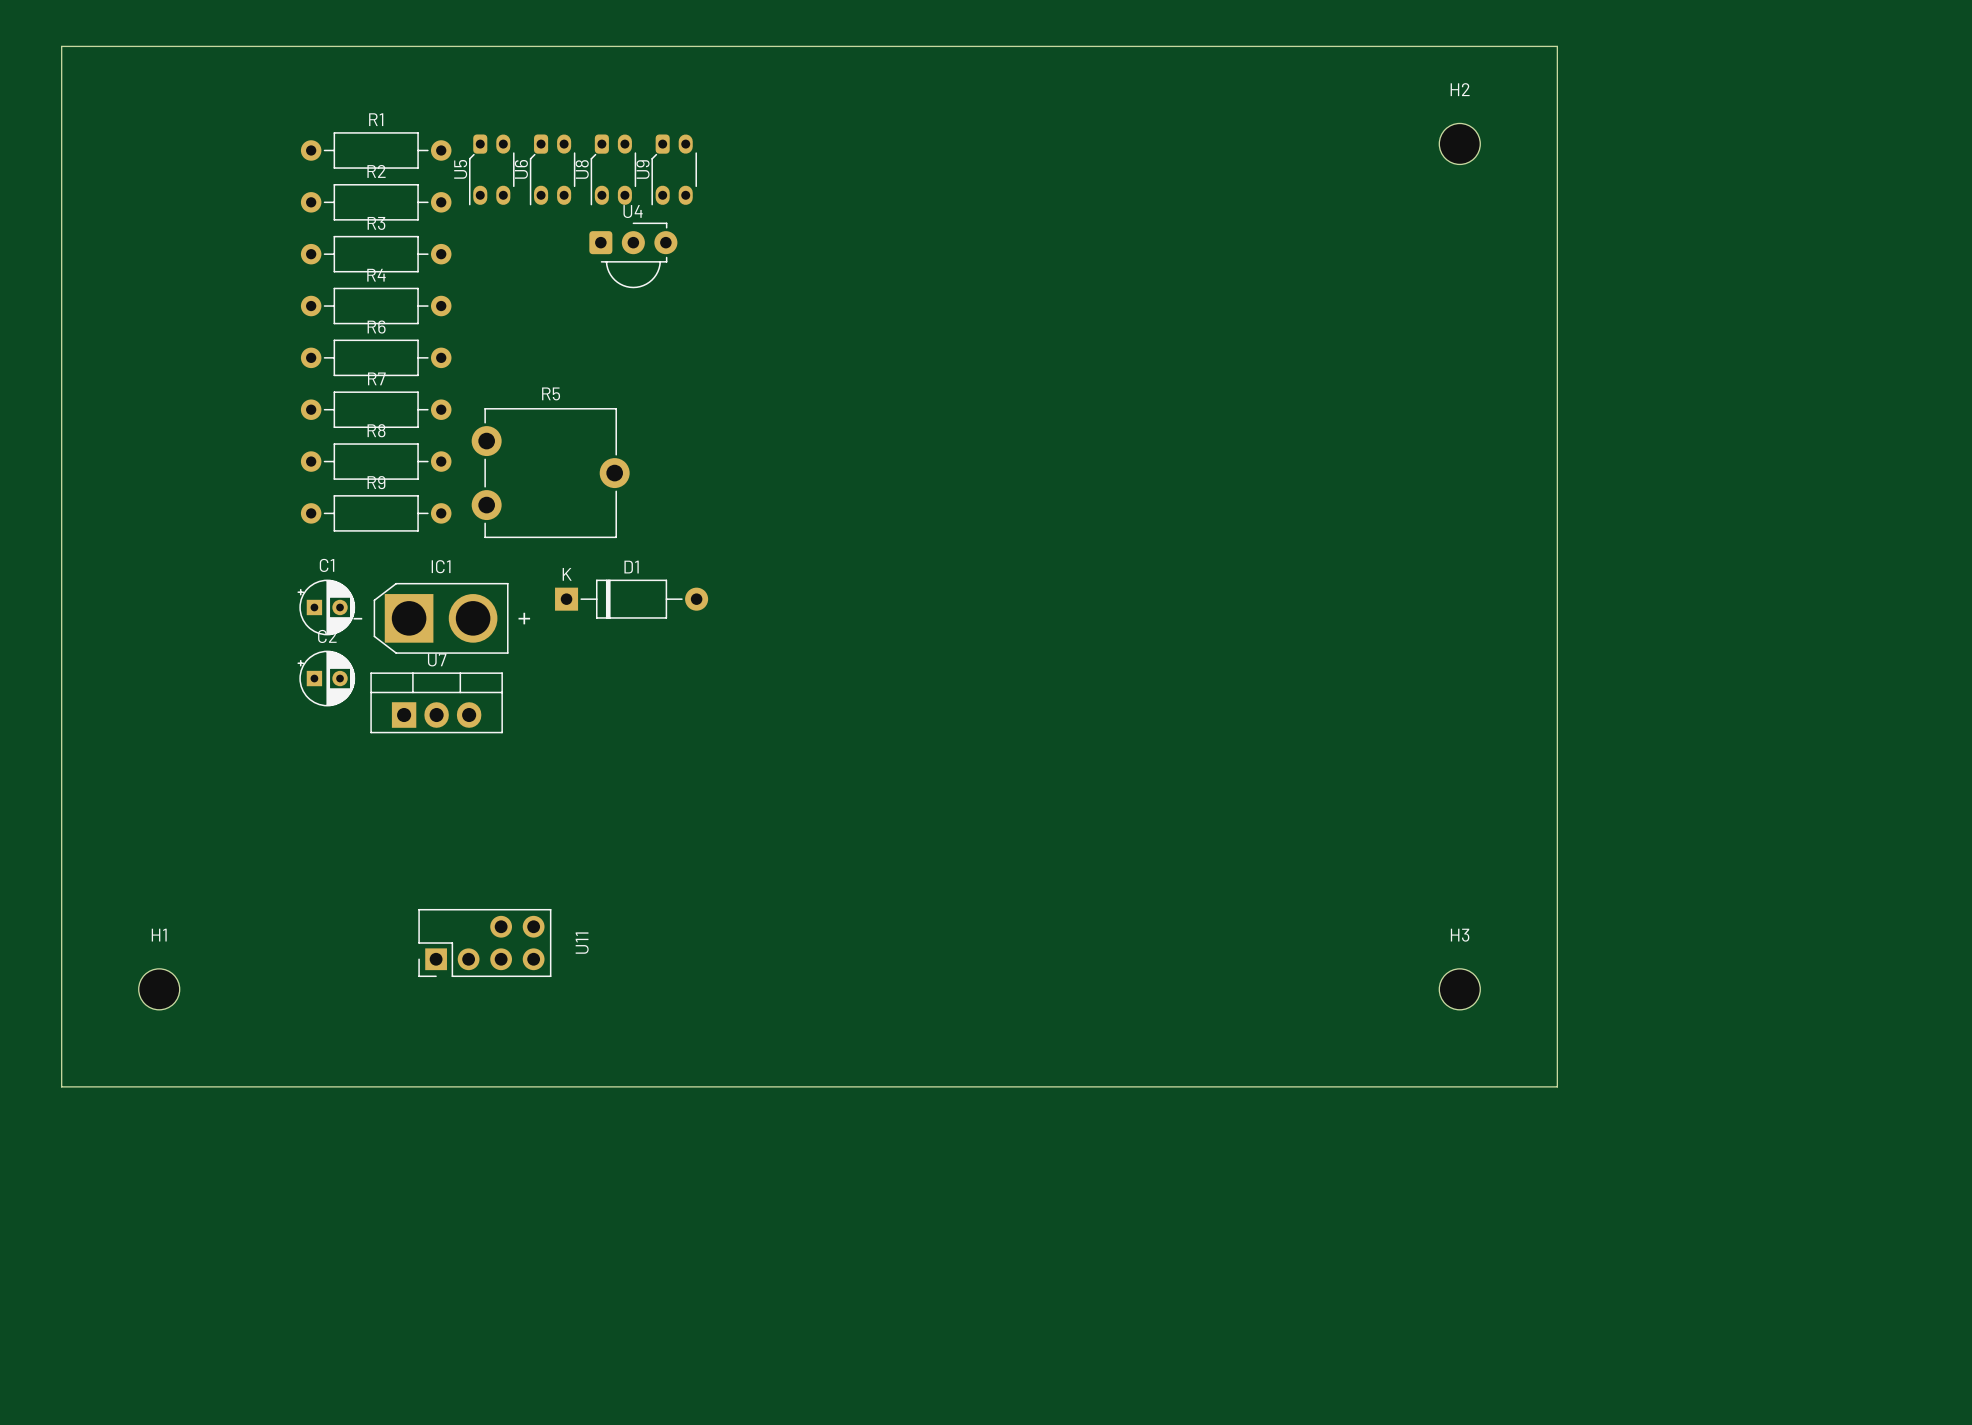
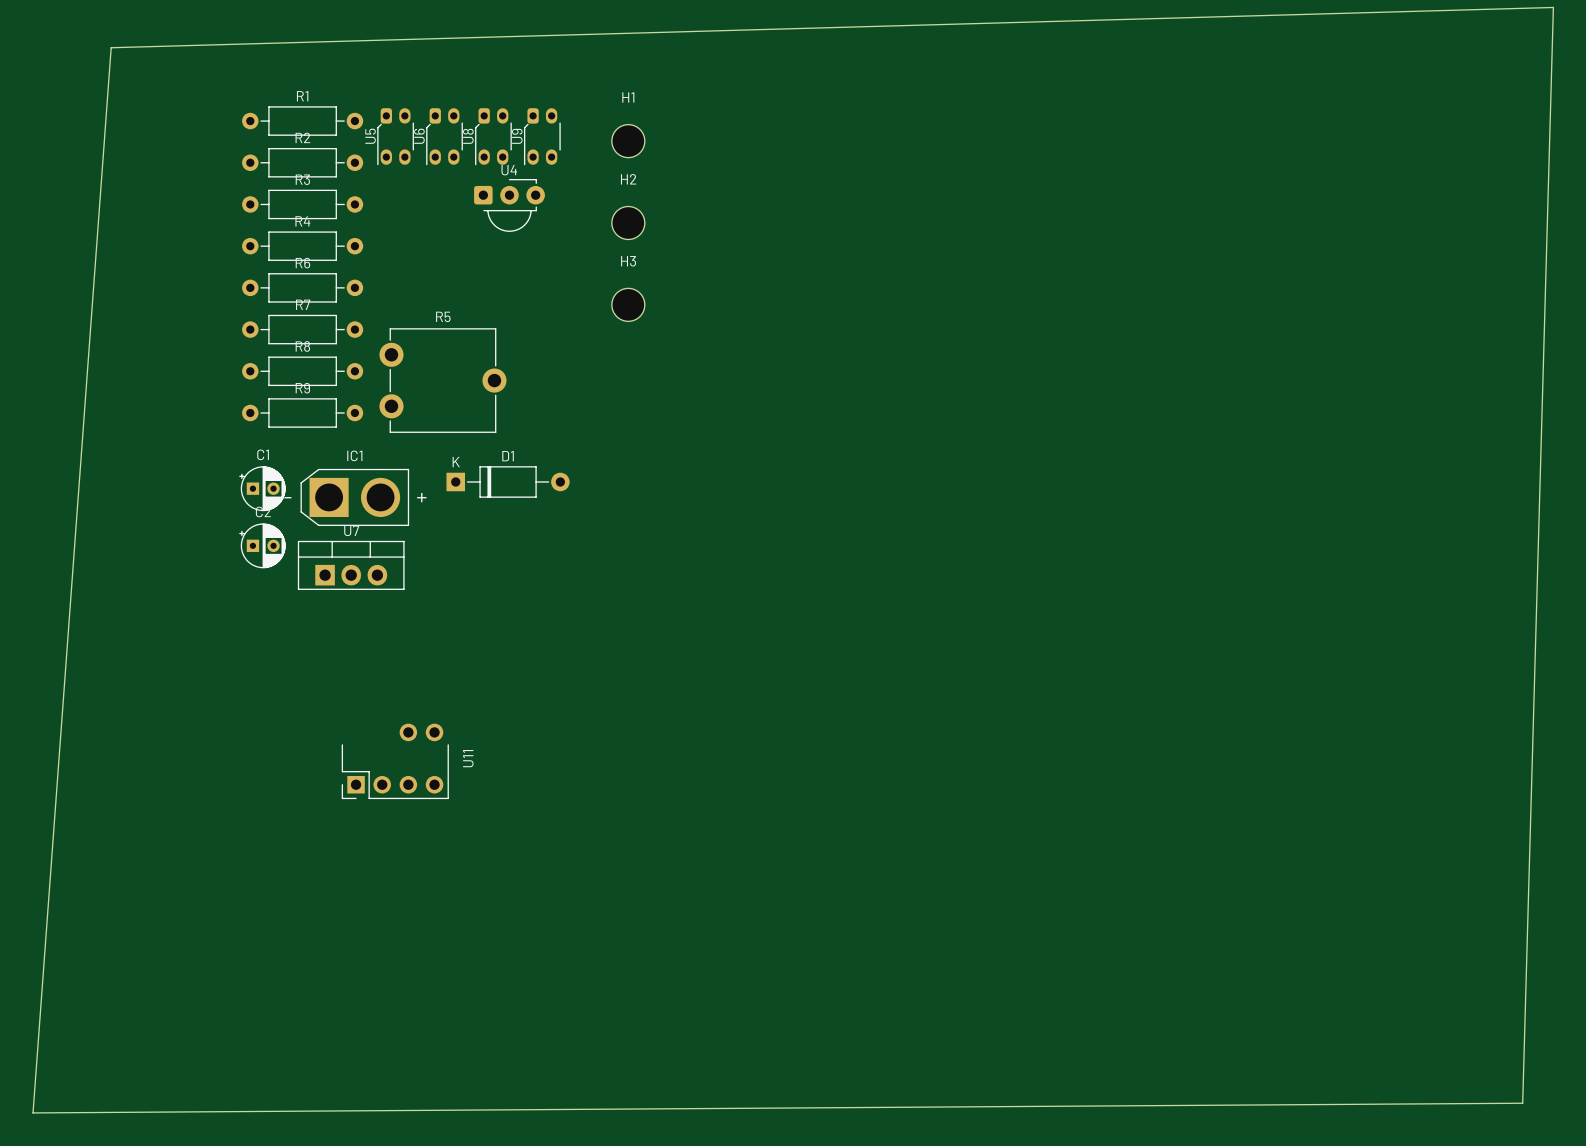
board edge: (61, 46) (1557, 46) (1557, 1086) (61, 1086) (61, 46) -> (1553, 7) (111, 47) (33, 1112) (1522, 1103) (1553, 7)
H2 position: (1459, 143) -> (628, 223)
U11 footprint: [418, 908, 552, 978] -> [341, 723, 449, 800]
H1 position: (159, 989) -> (628, 141)
H3 position: (1459, 989) -> (628, 304)

